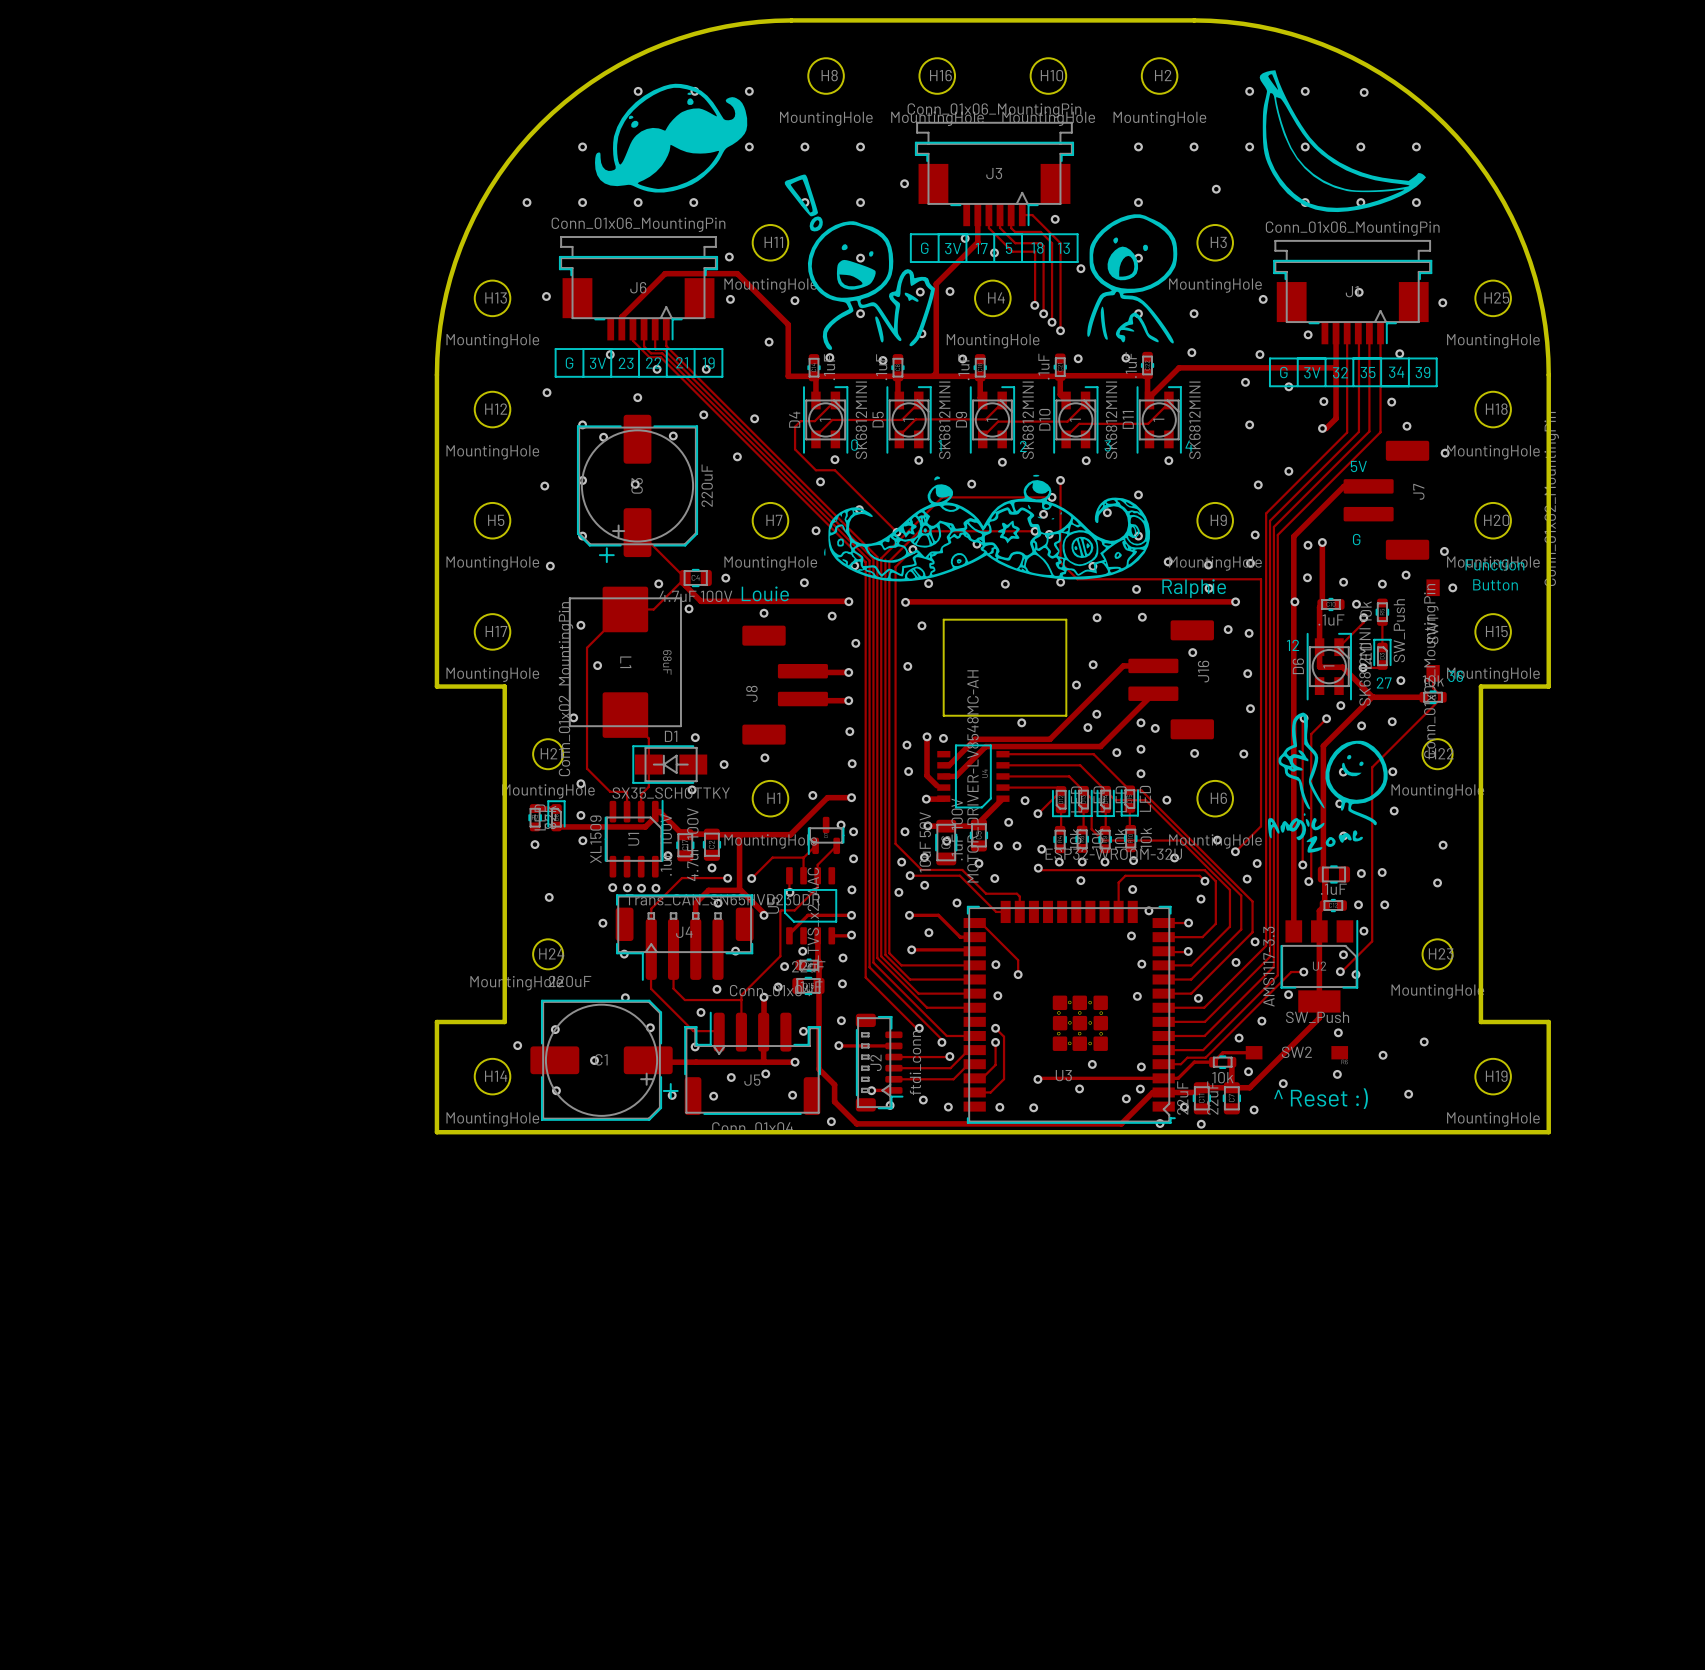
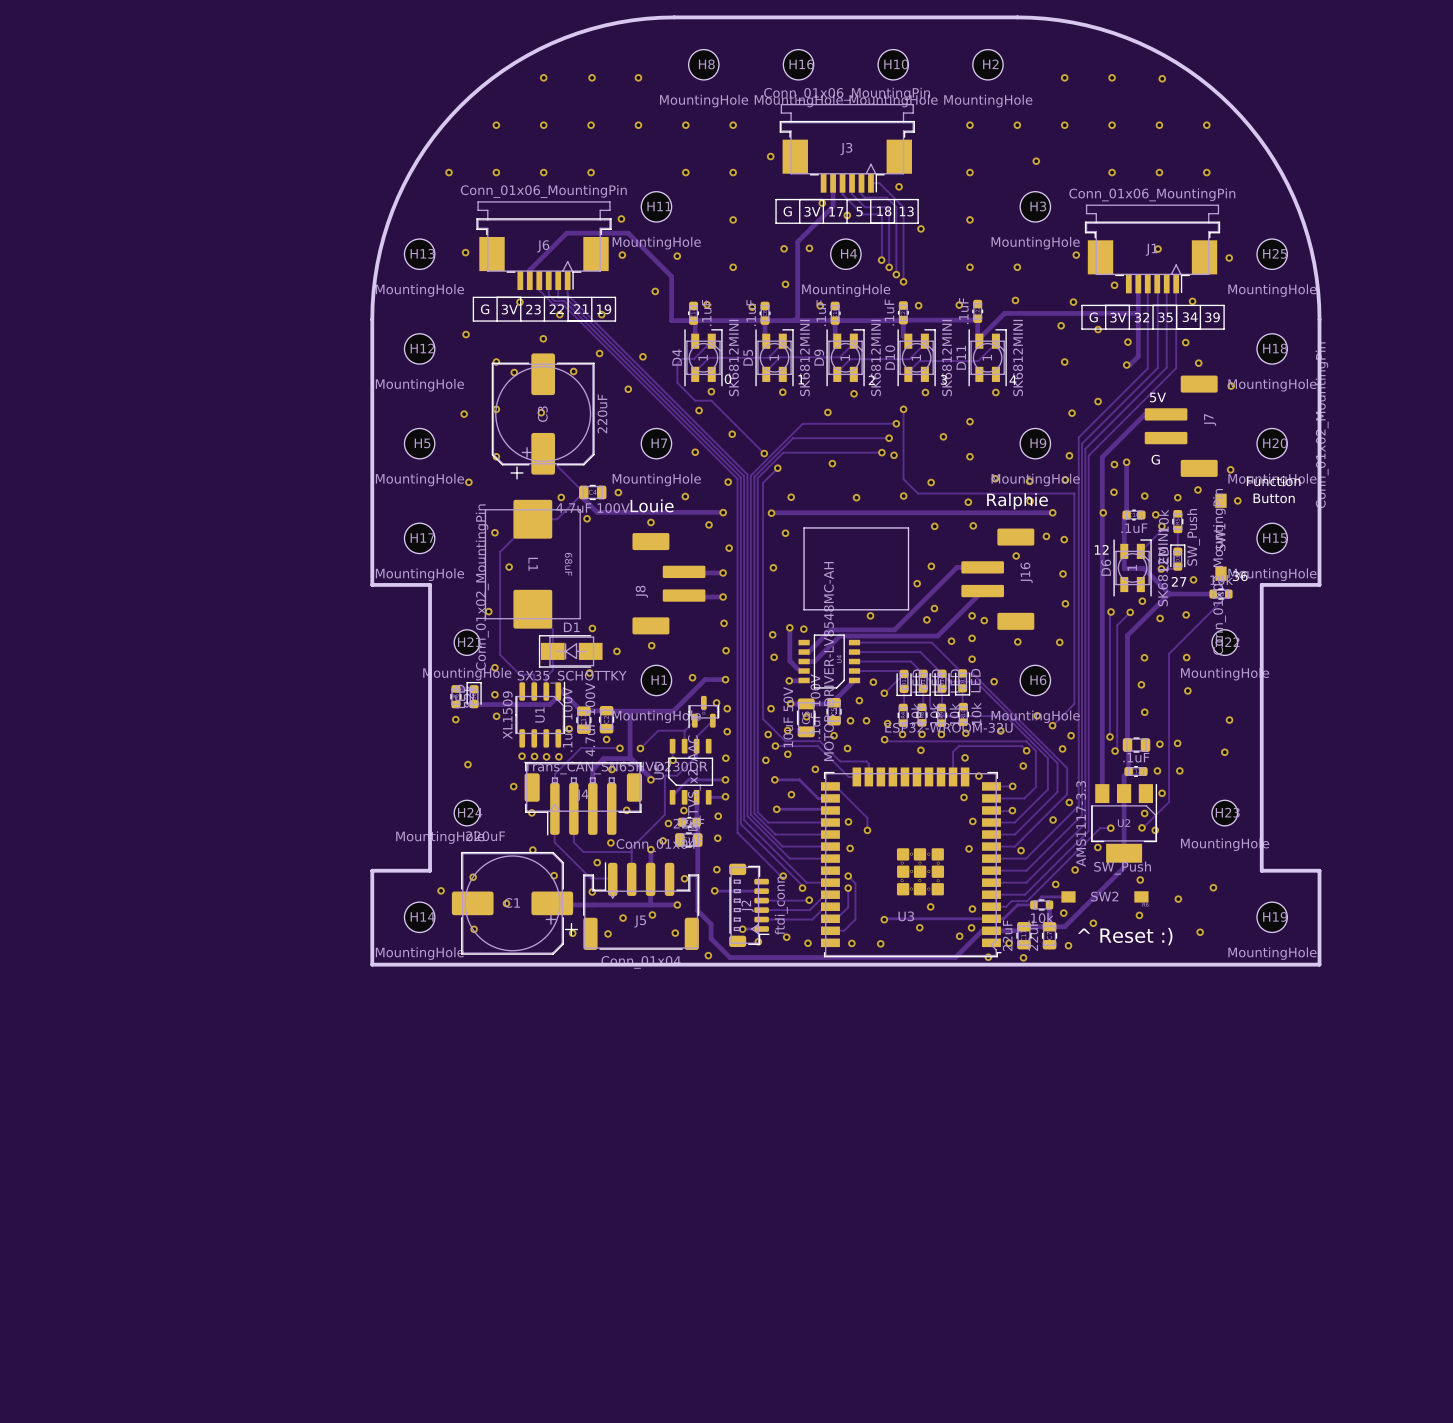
drawing: [595, 70, 1427, 853] -> none
track: none -> (889, 438) (793, 438) (754, 476)

